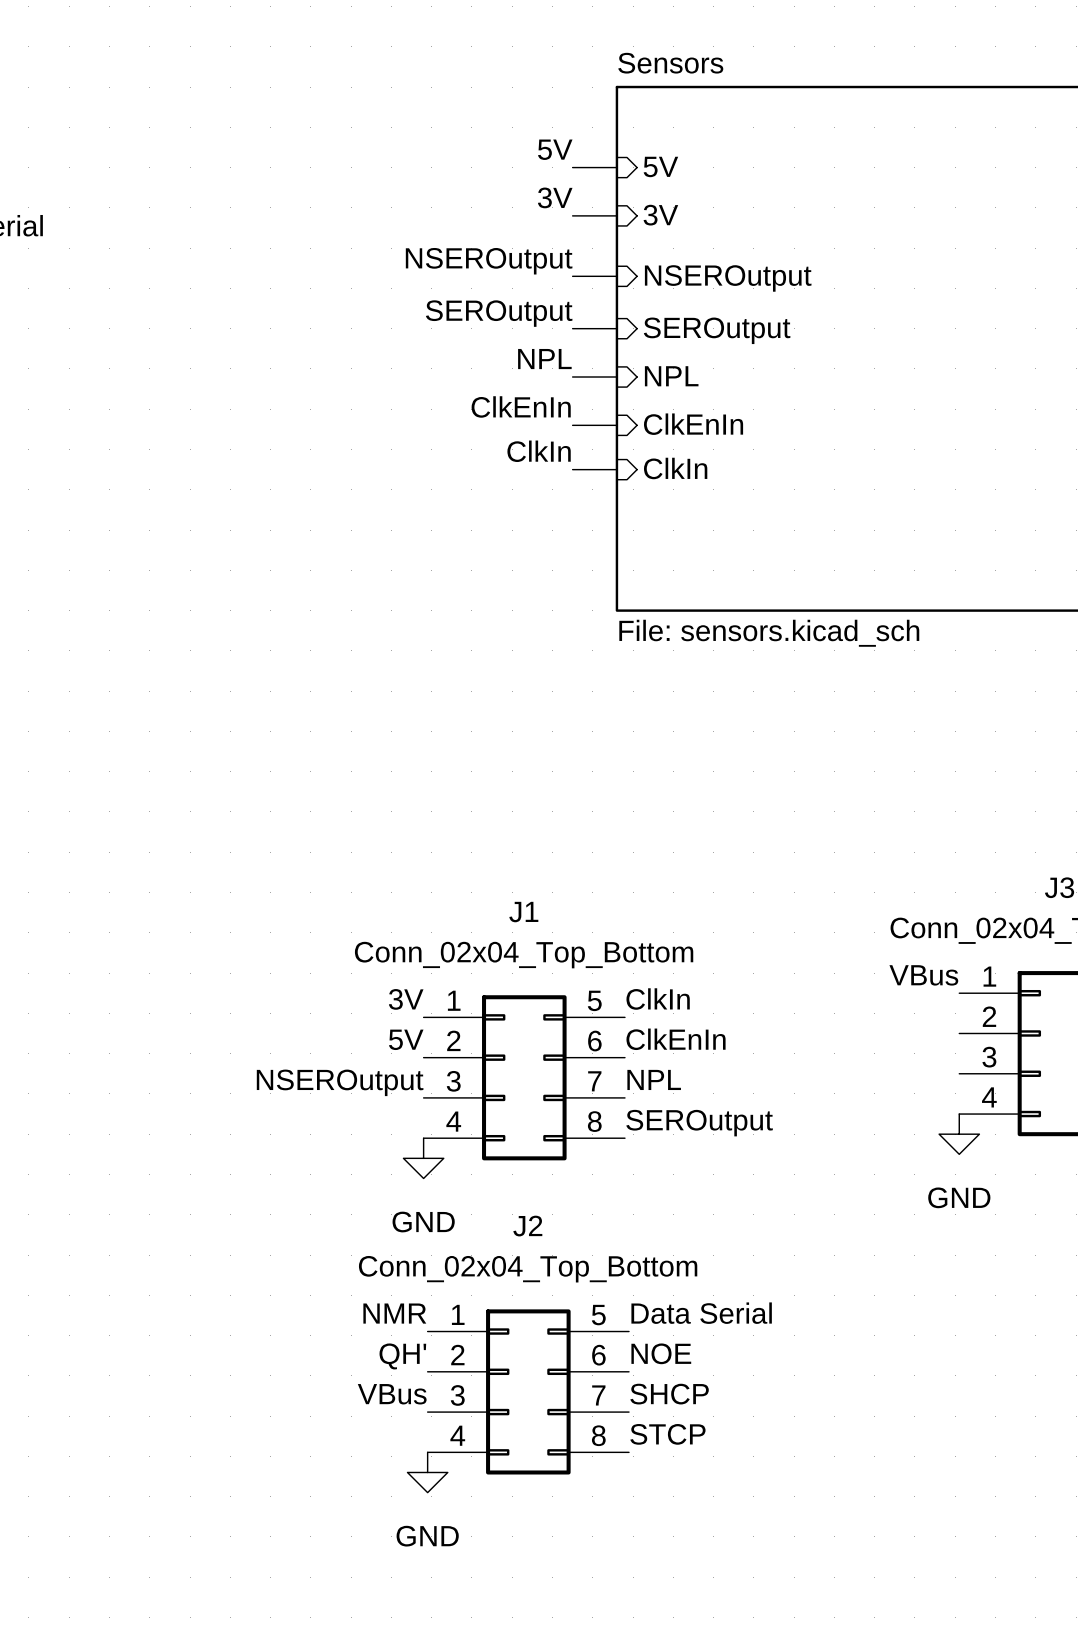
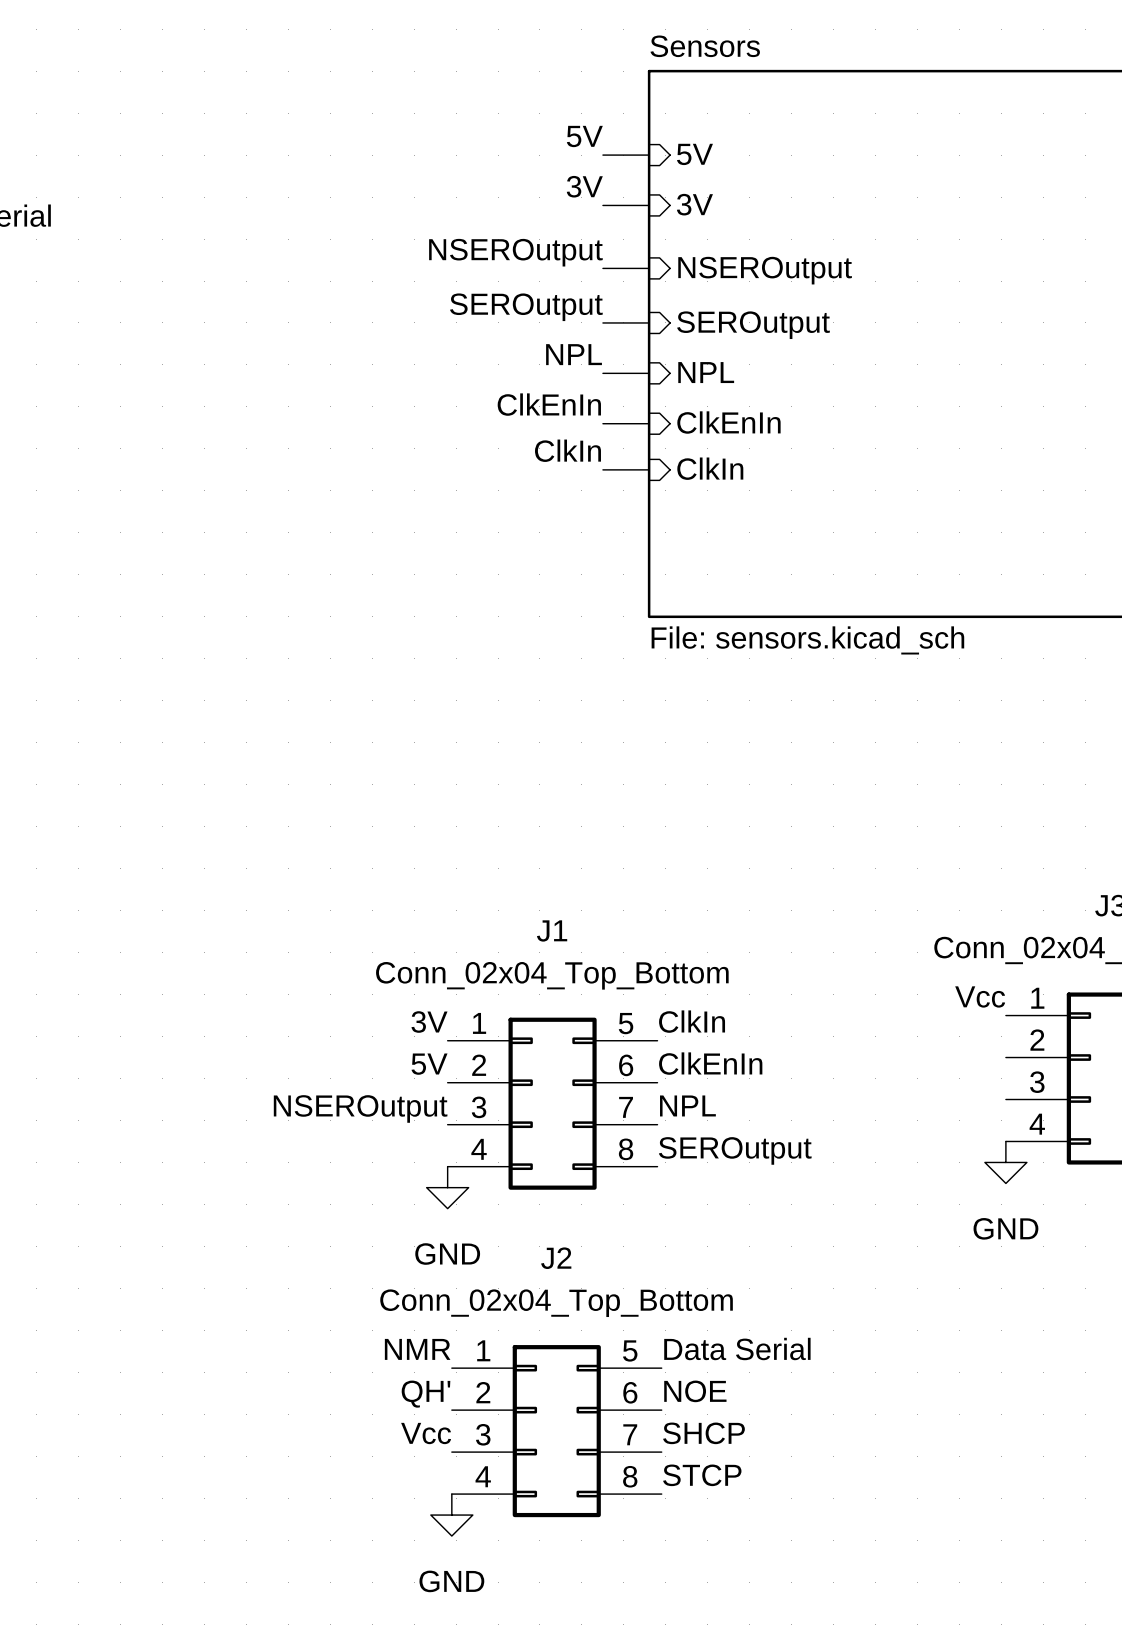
label: VBus (923, 975) -> Vcc (980, 996)
label: VBus (392, 1394) -> Vcc (426, 1433)

